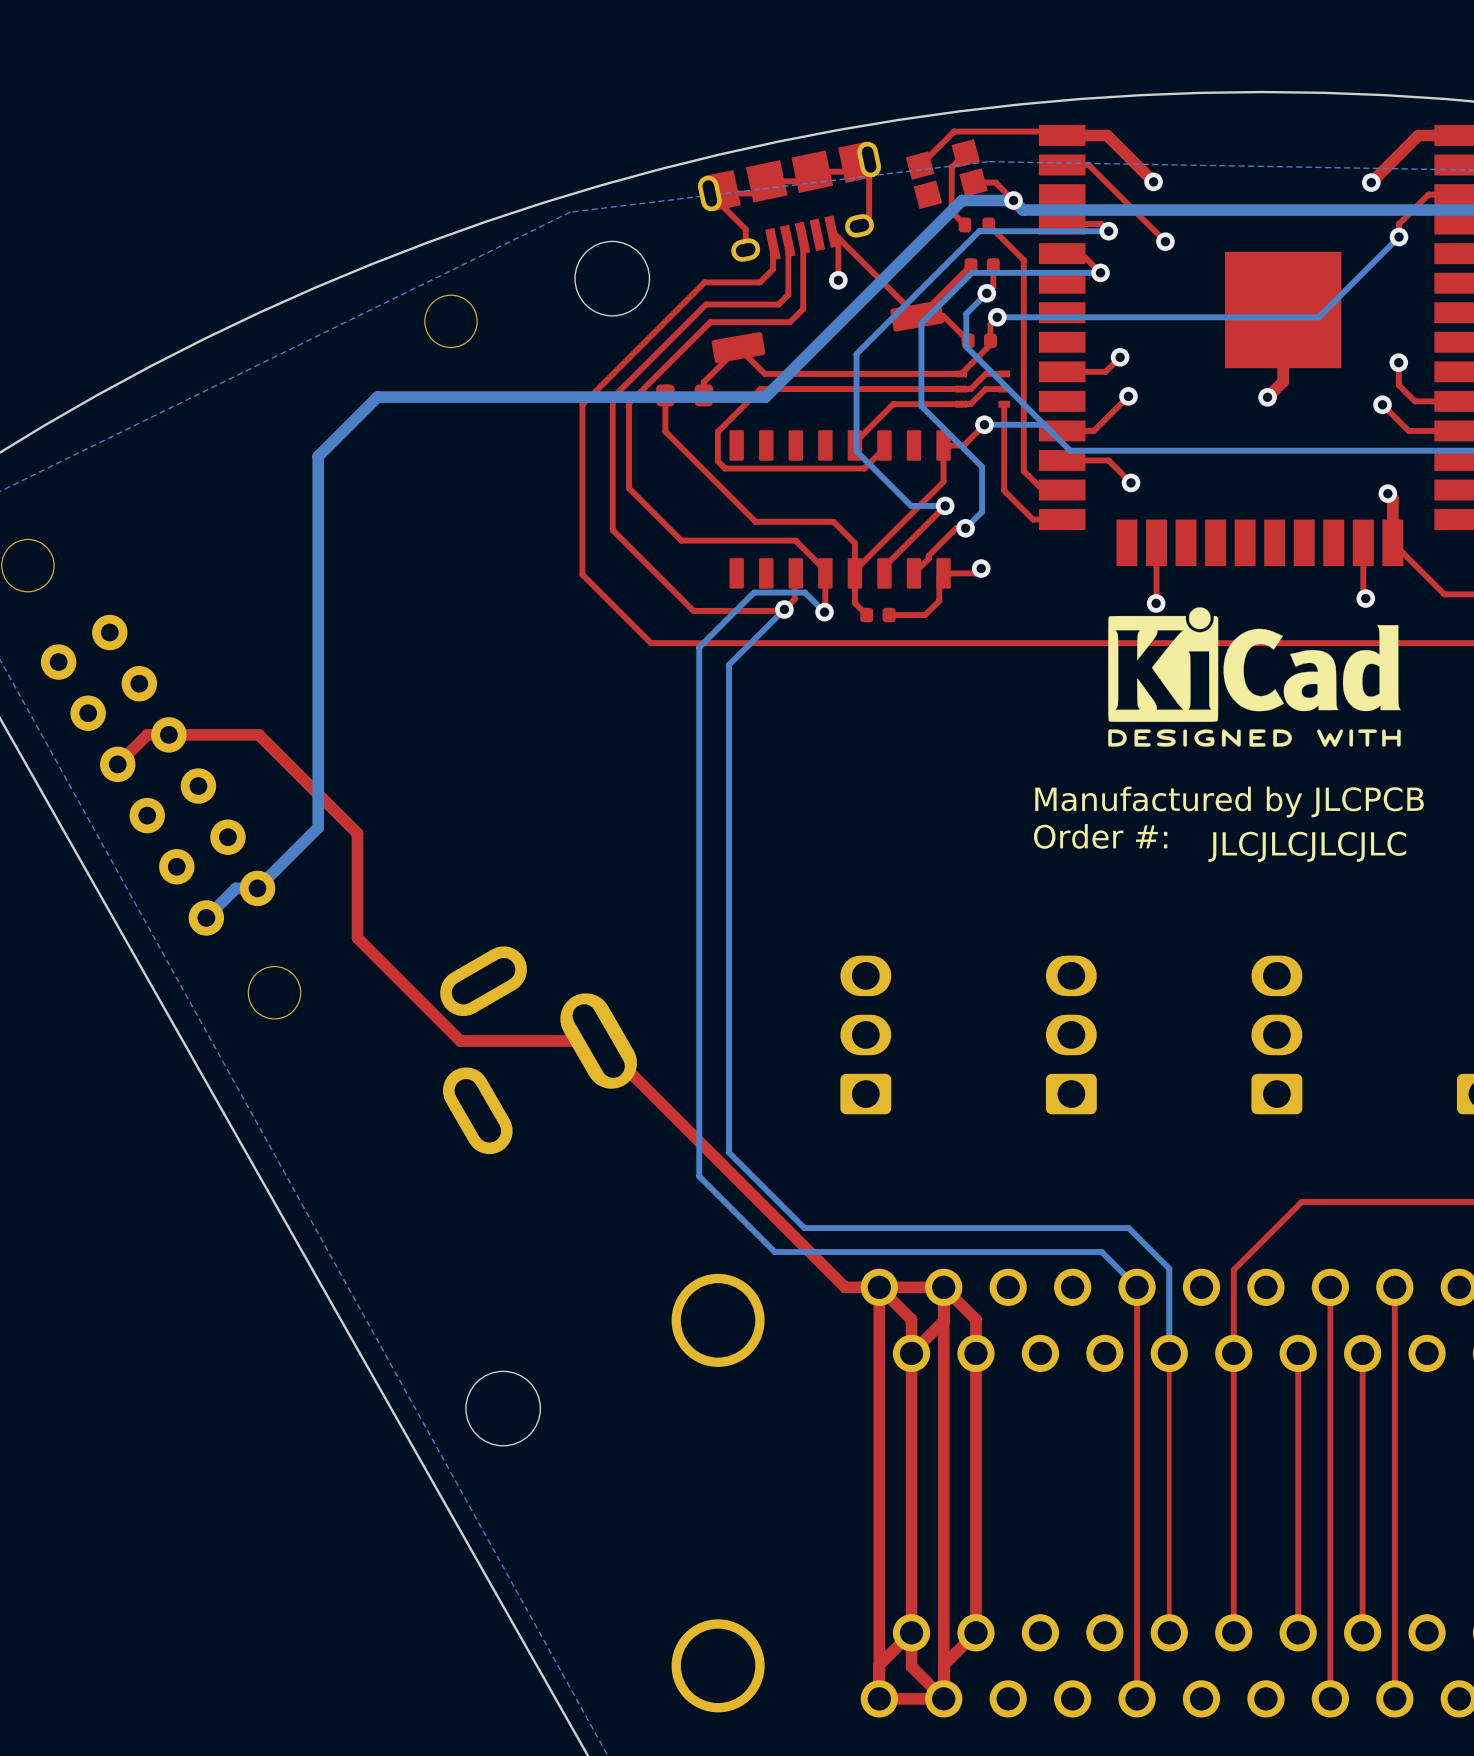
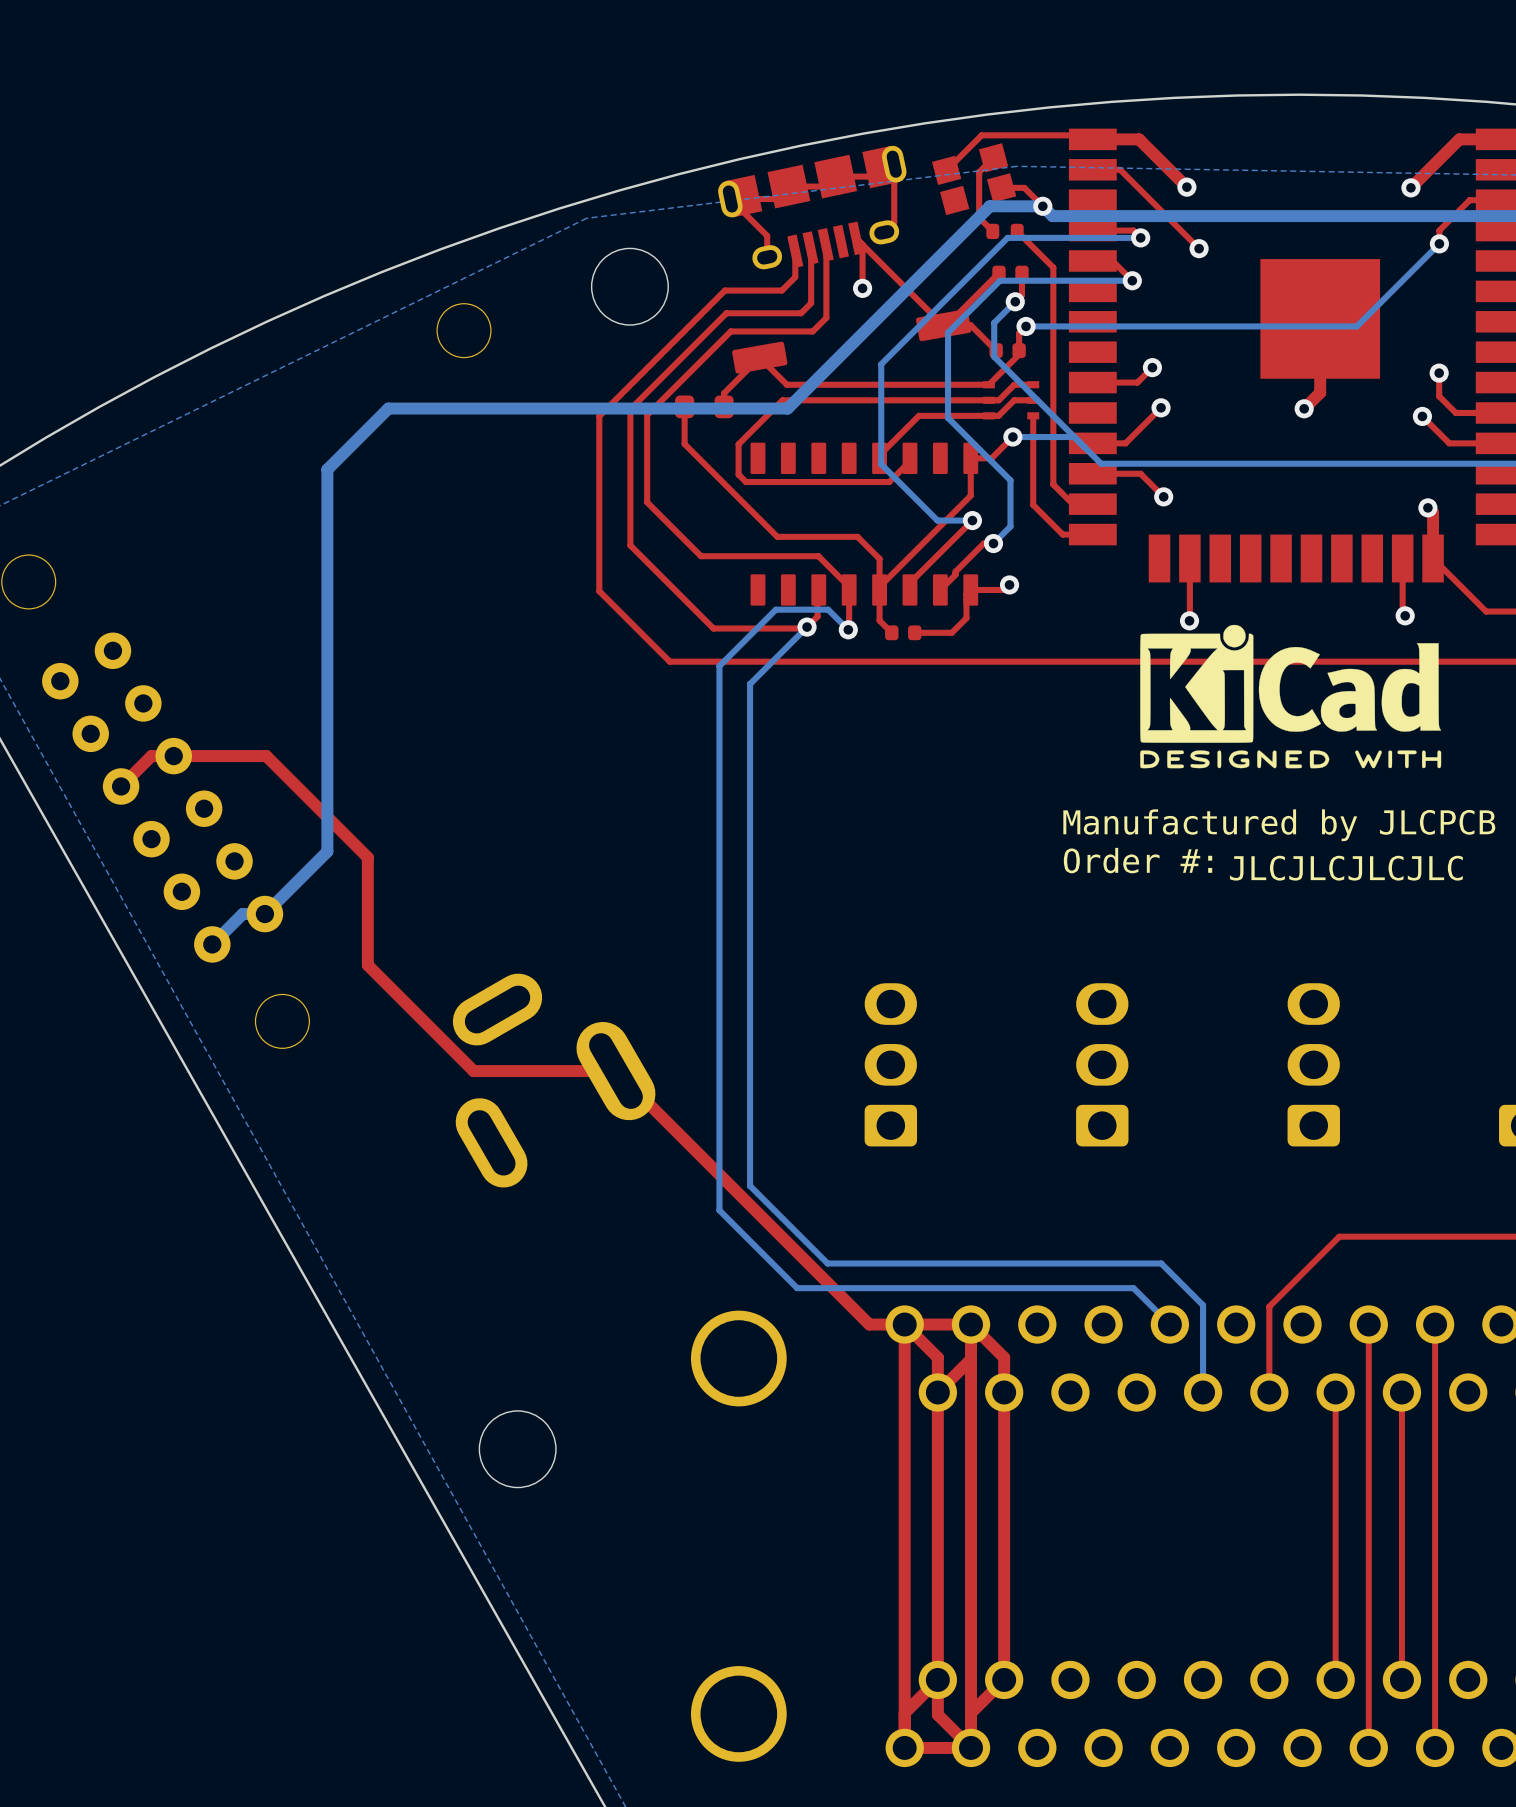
top track: (1137, 1287) (1137, 1698) -> none
top track: (1169, 1353) (1169, 1632) -> none
top track: (1233, 1353) (1233, 1632) -> none

